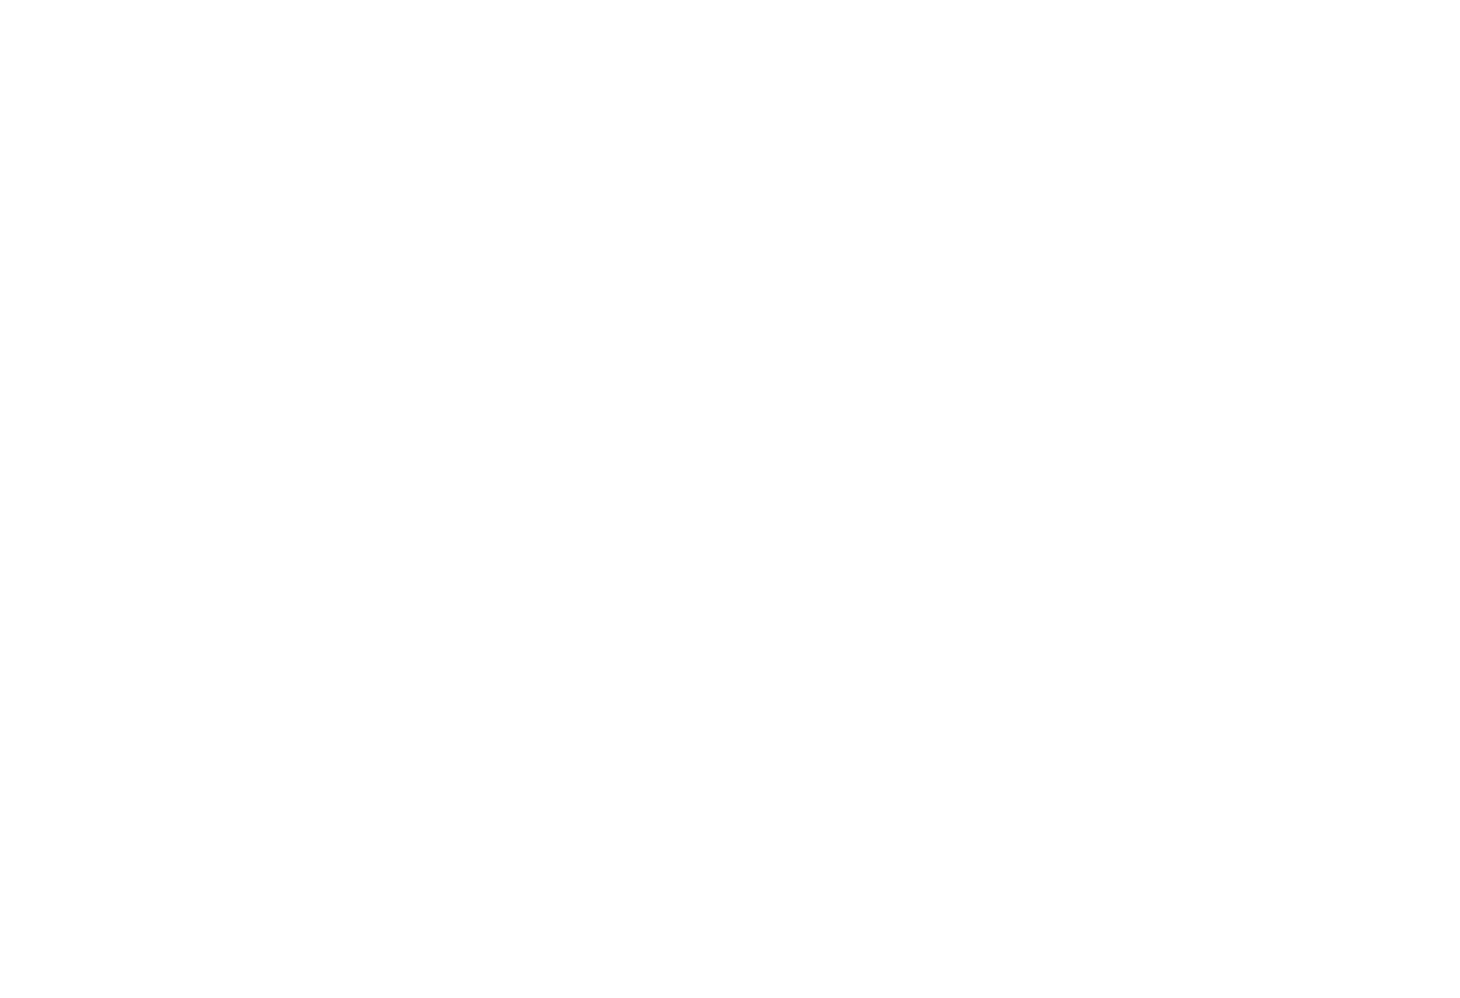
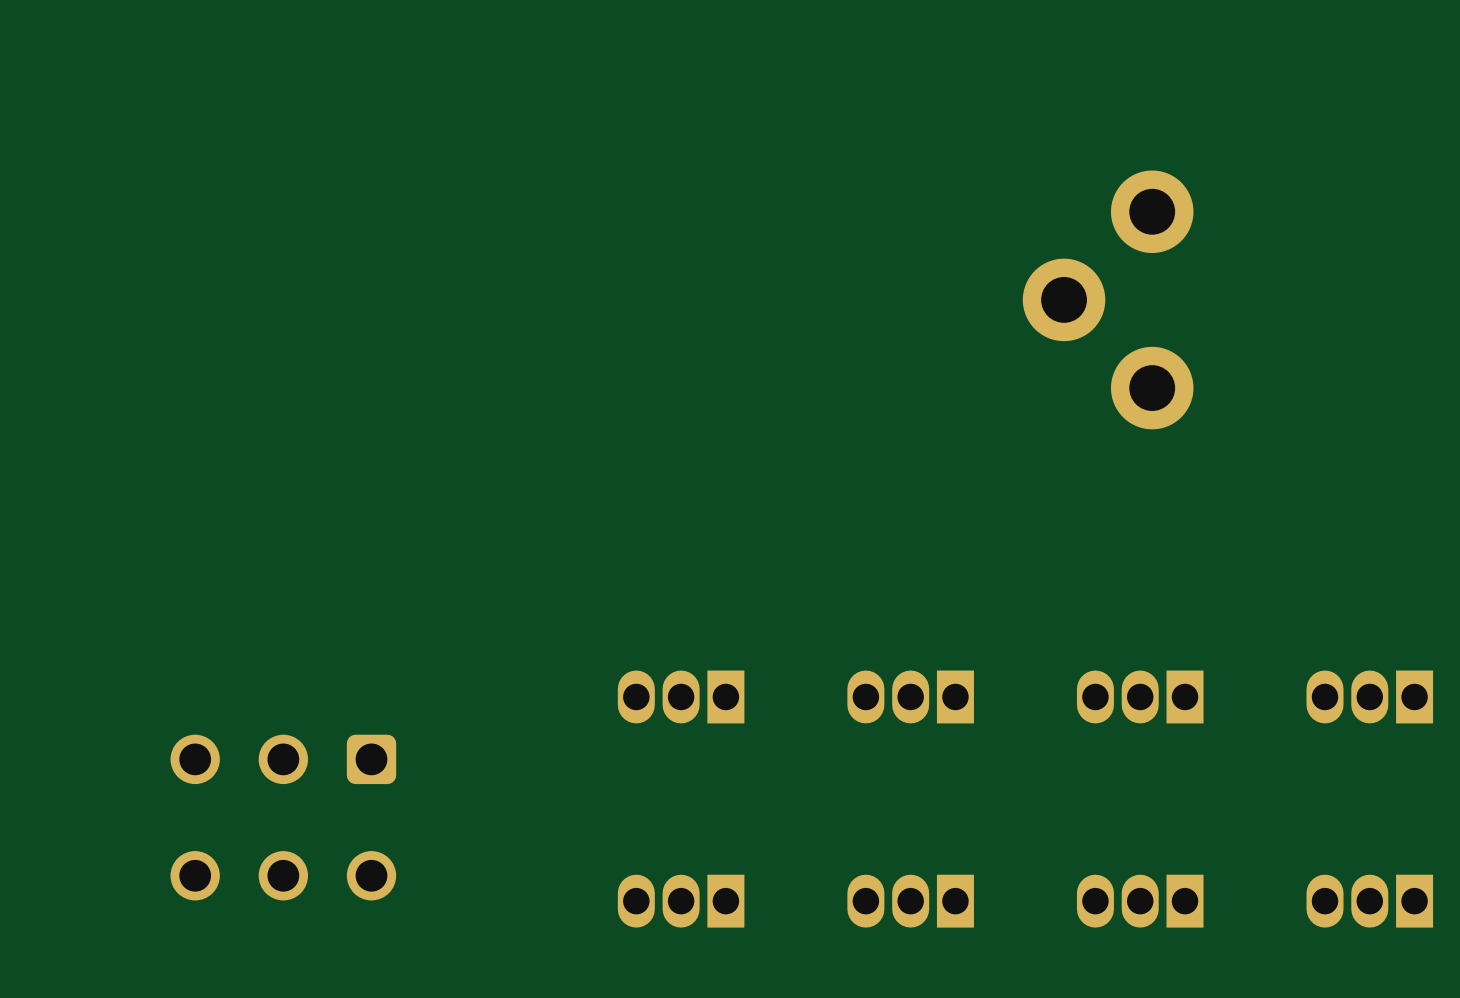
part: none -> (1108, 299)
part: none -> (681, 696)
part: none -> (910, 696)
part: none -> (1140, 696)
part: none -> (1369, 696)
part: none -> (283, 817)
part: none -> (681, 901)
part: none -> (910, 901)
part: none -> (1140, 901)
part: none -> (1369, 901)

